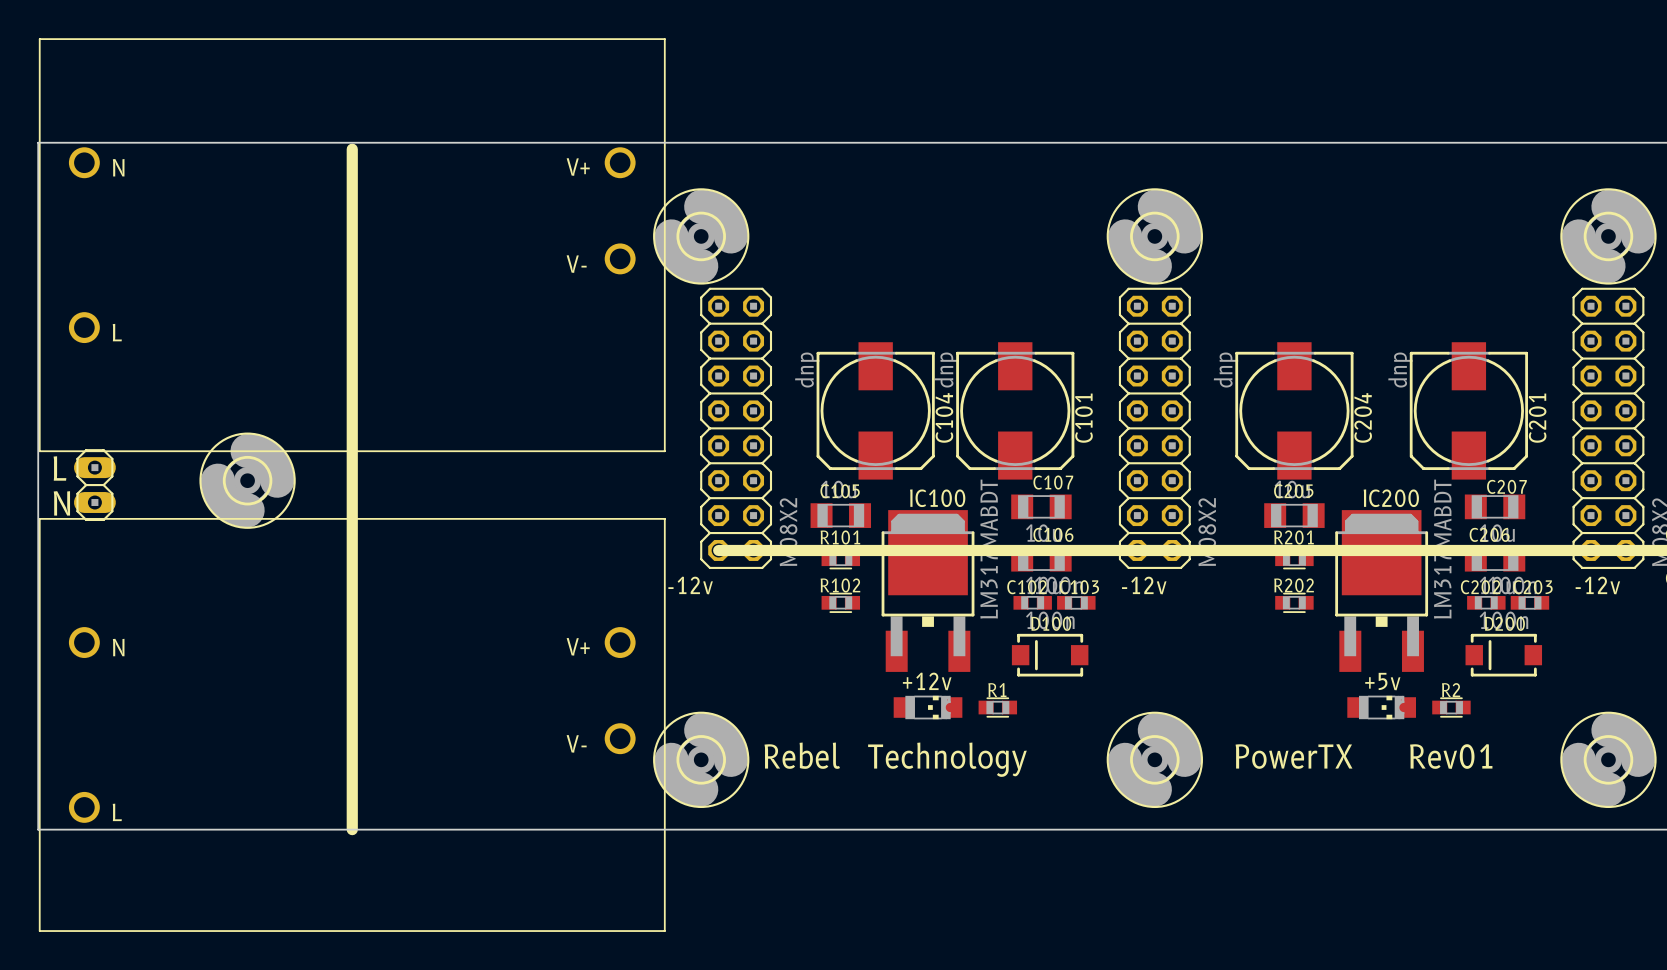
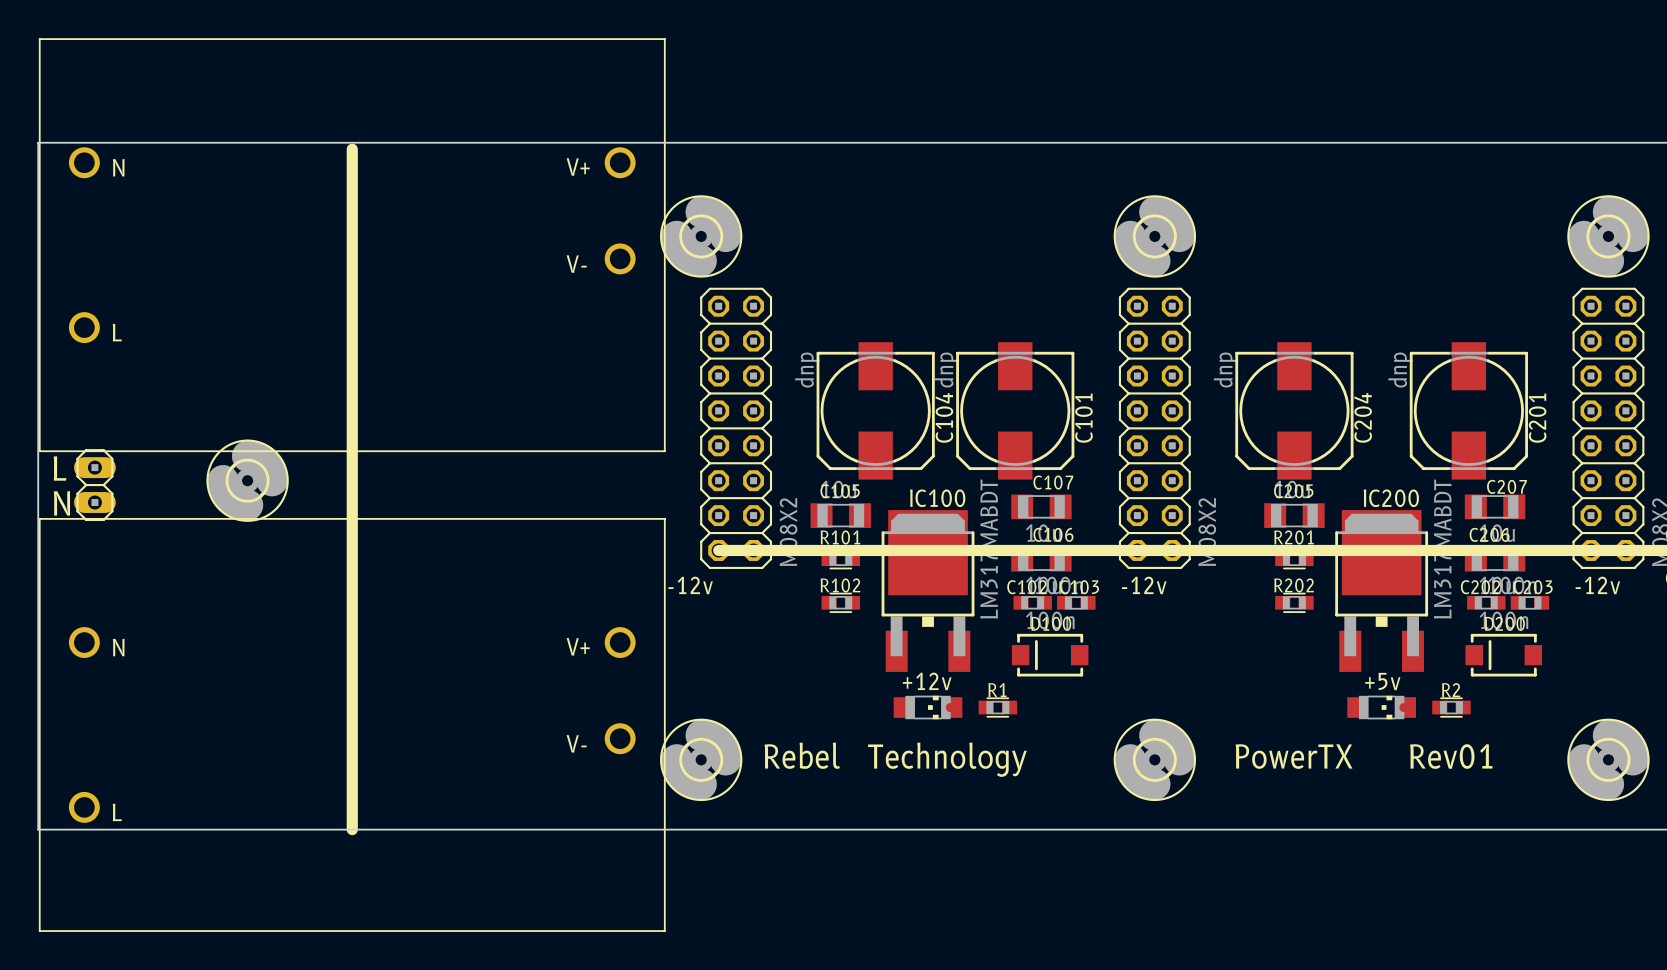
part footprint: [653, 188, 750, 285] -> [660, 195, 743, 278]
part footprint: [1106, 188, 1203, 285] -> [1113, 195, 1197, 278]
part footprint: [1560, 188, 1657, 285] -> [1567, 195, 1650, 278]
part footprint: [199, 432, 296, 529] -> [206, 439, 289, 522]
part footprint: [653, 711, 750, 809] -> [660, 718, 743, 802]
part footprint: [1106, 711, 1203, 809] -> [1113, 718, 1197, 802]
part footprint: [1560, 711, 1657, 809] -> [1567, 718, 1650, 802]

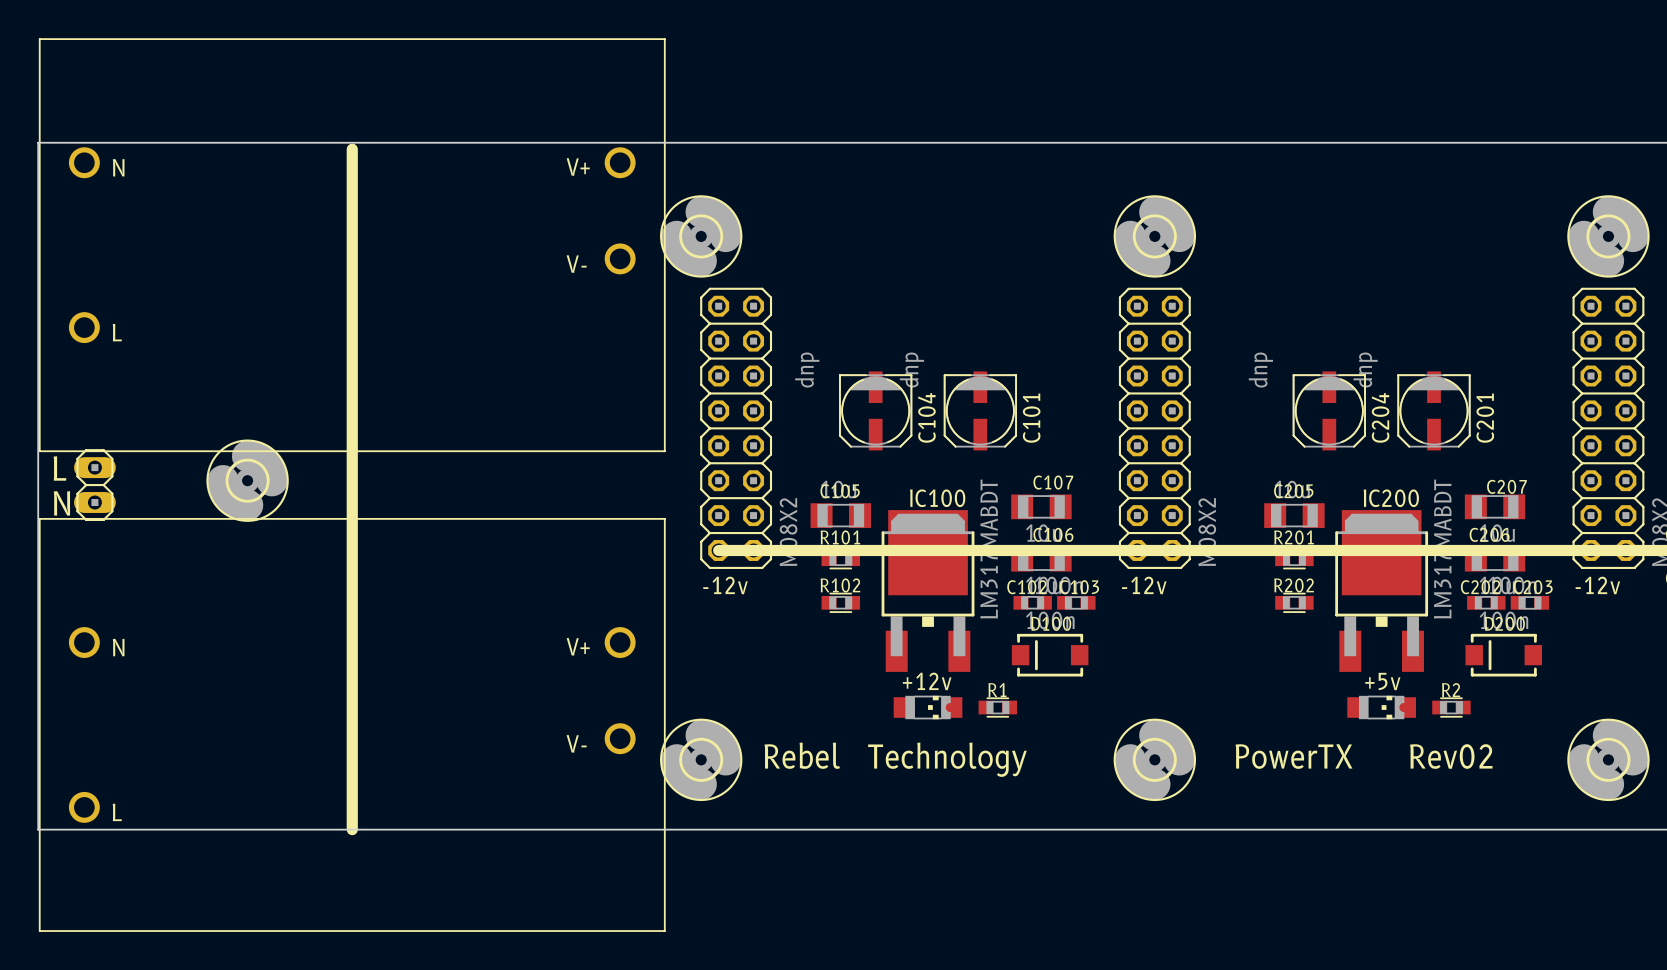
C104 footprint: [816, 342, 935, 480] -> [839, 371, 913, 451]
C101 footprint: [956, 342, 1075, 480] -> [943, 371, 1017, 451]
C204 footprint: [1235, 342, 1354, 480] -> [1292, 371, 1366, 451]
C201 footprint: [1409, 342, 1528, 480] -> [1397, 371, 1471, 451]
text position: -12v (690, 585) -> -12v (725, 585)
text: Rev01 (1451, 756) -> Rev02 (1451, 756)

